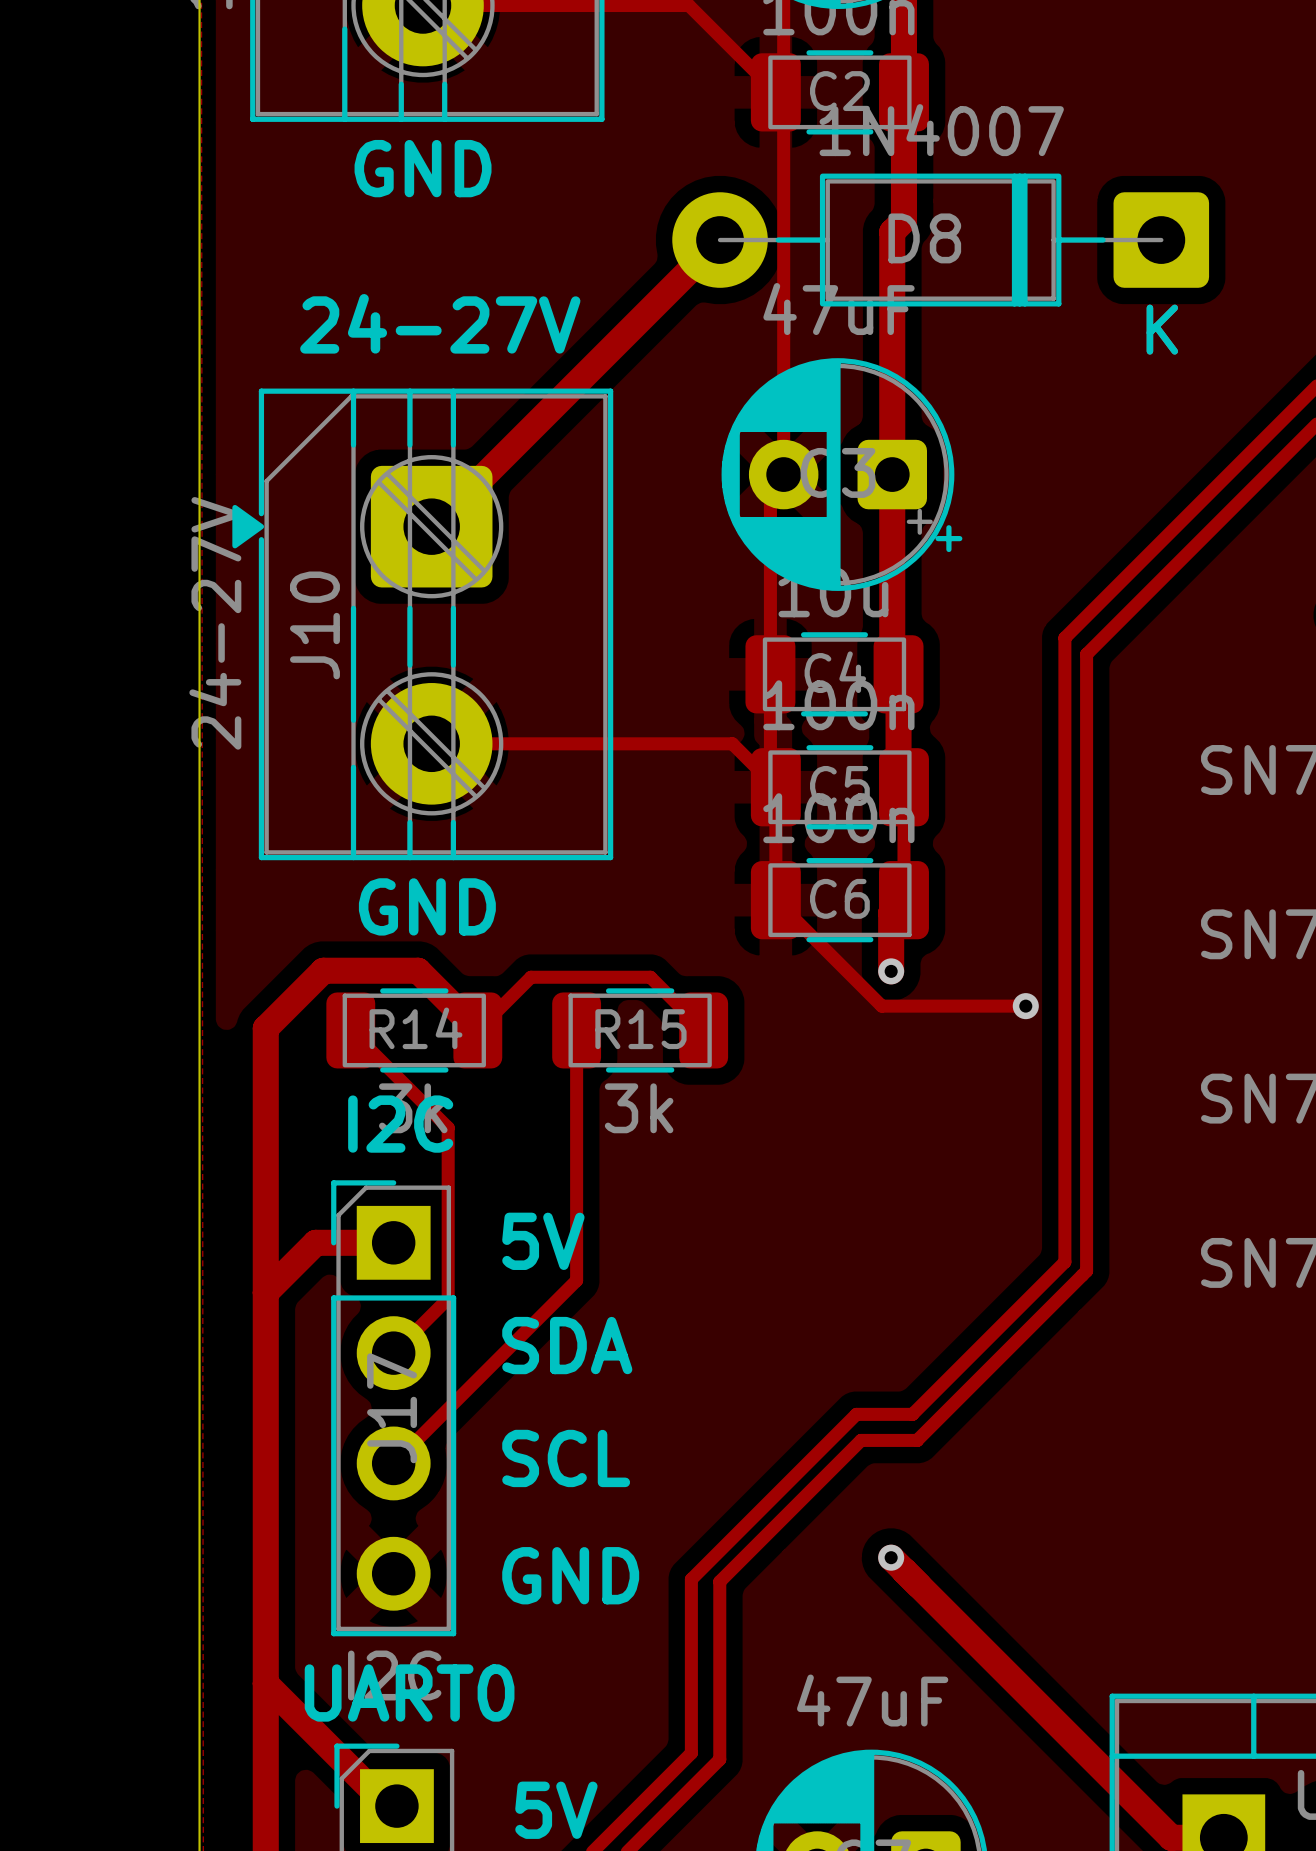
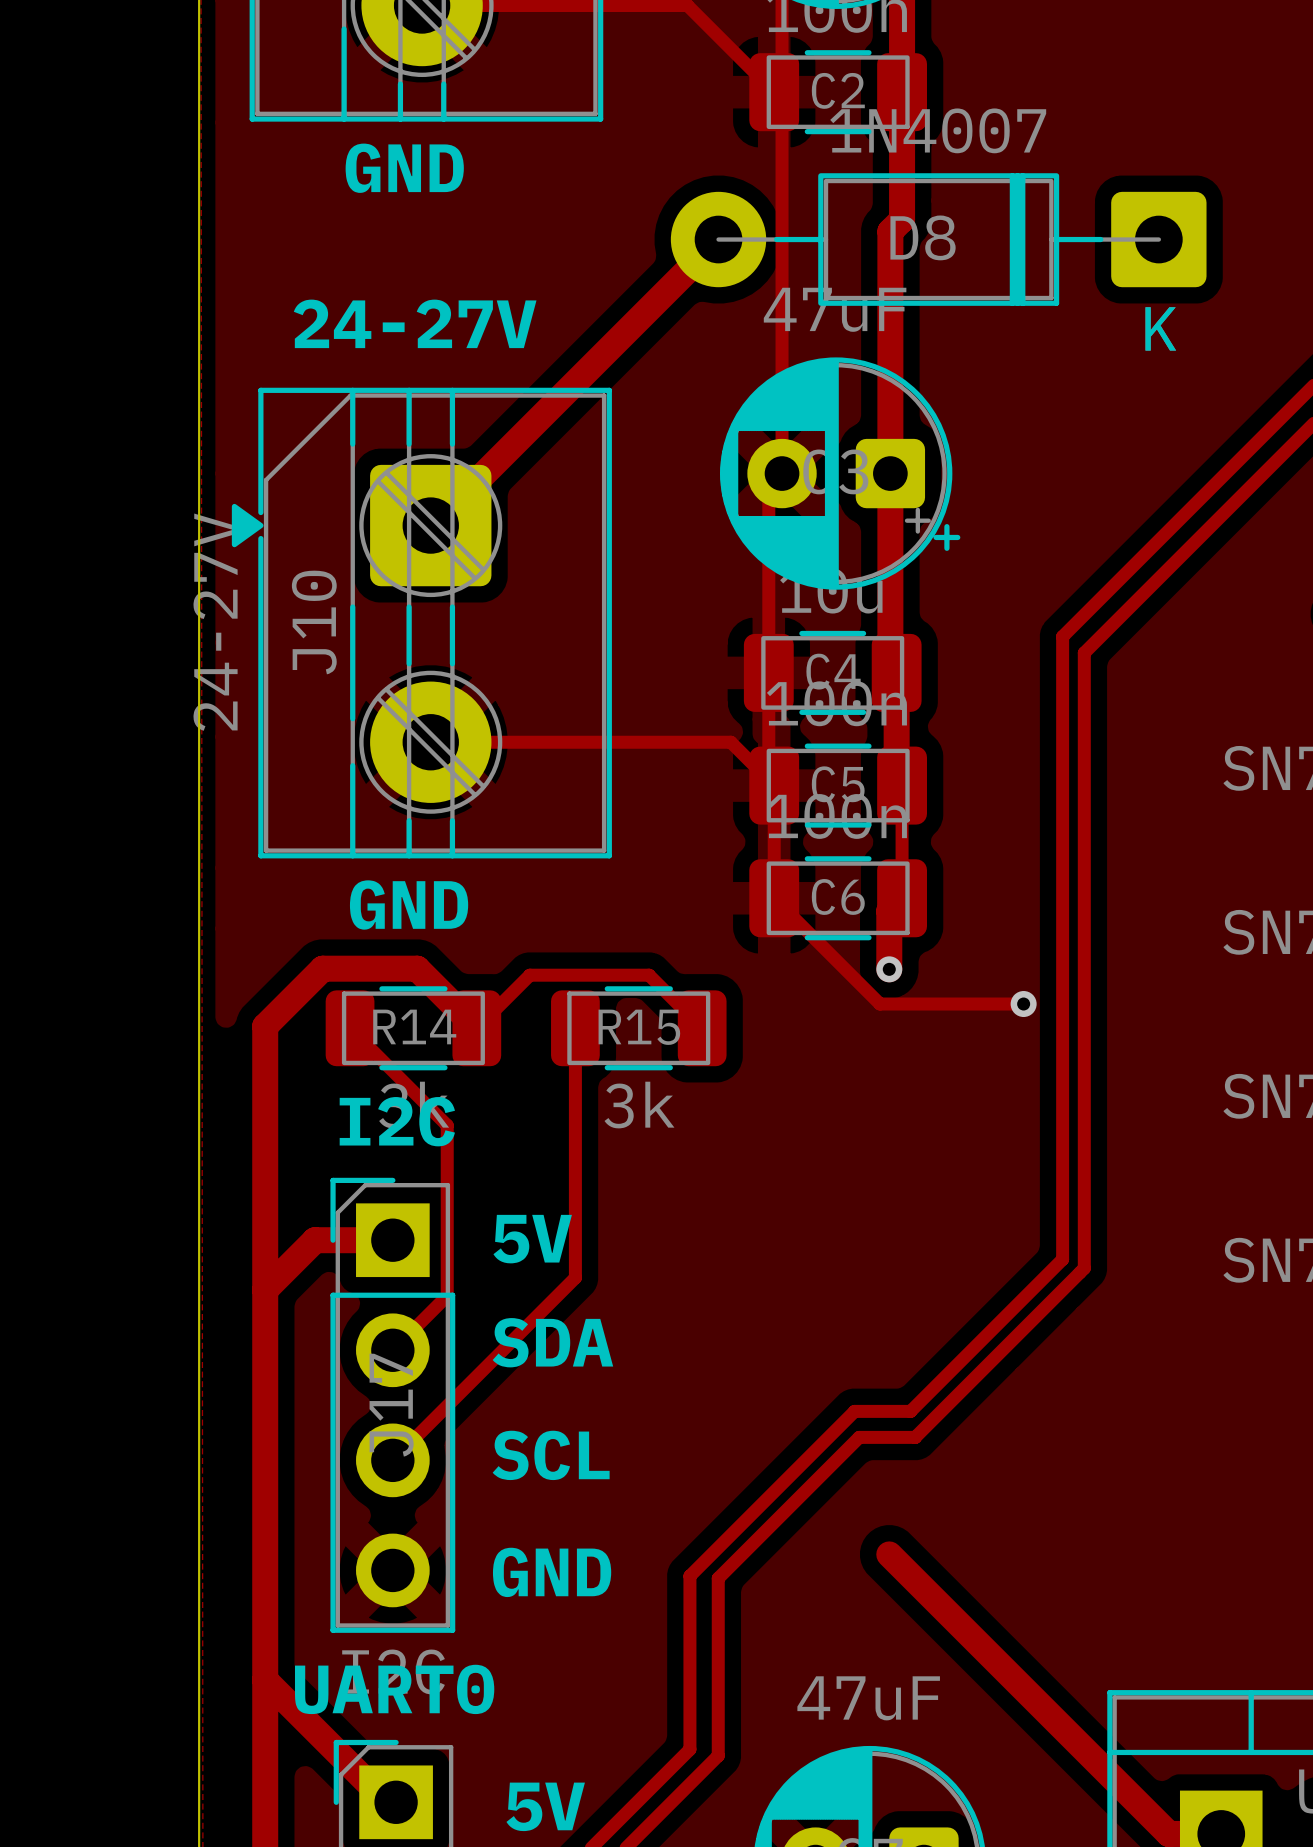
via: (891, 1557) -> none

